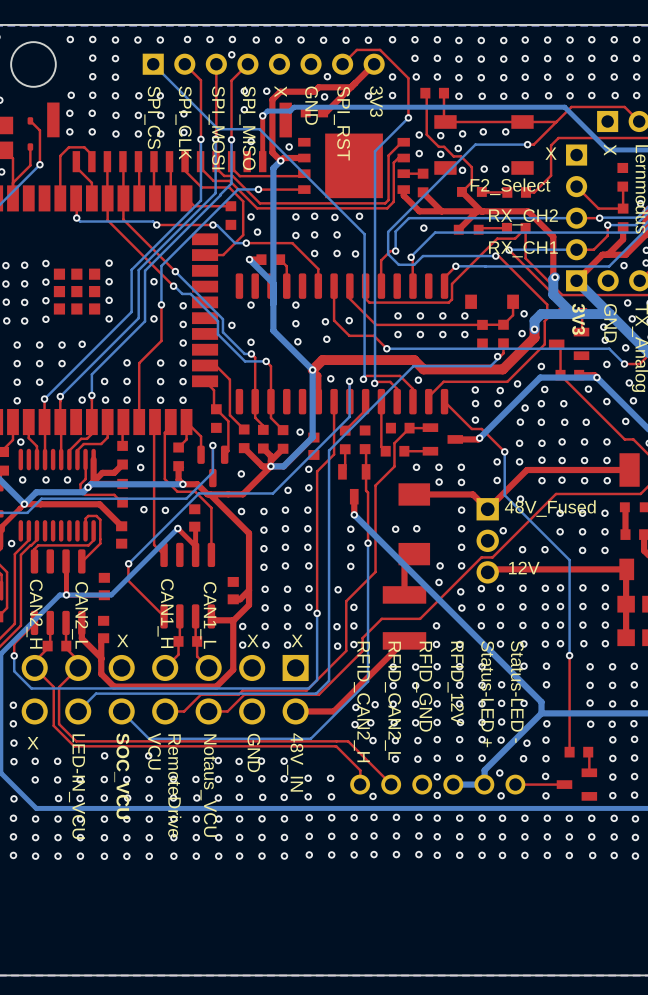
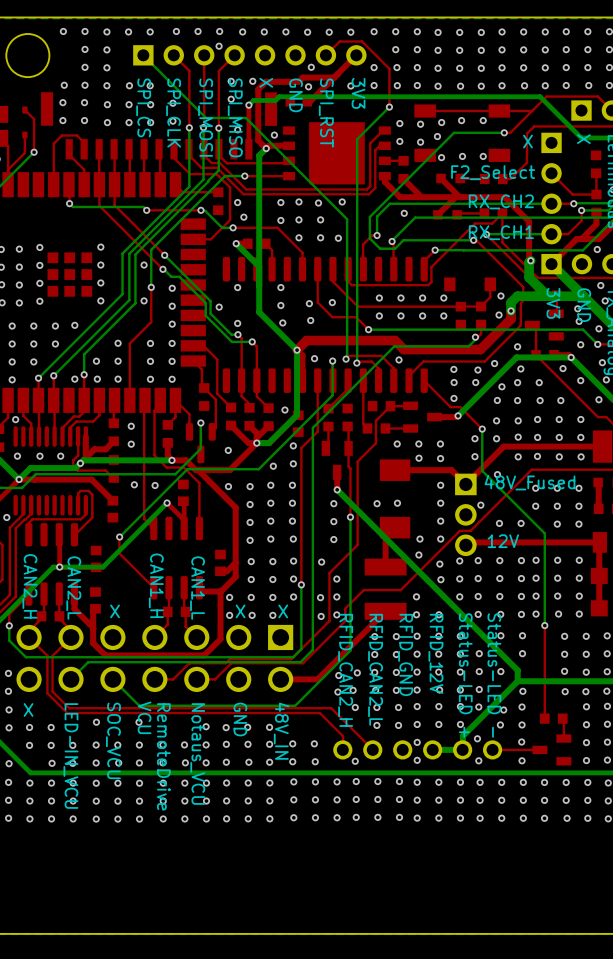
top track: (425, 93) (426, 134) (438, 146) (444, 146) (453, 156) (461, 156) (471, 167) (471, 182) (461, 191) -> none
part: (434, 93) -> none
top track: (443, 93) (445, 121) -> none
via: none -> (397, 85)
via: none -> (417, 85)

